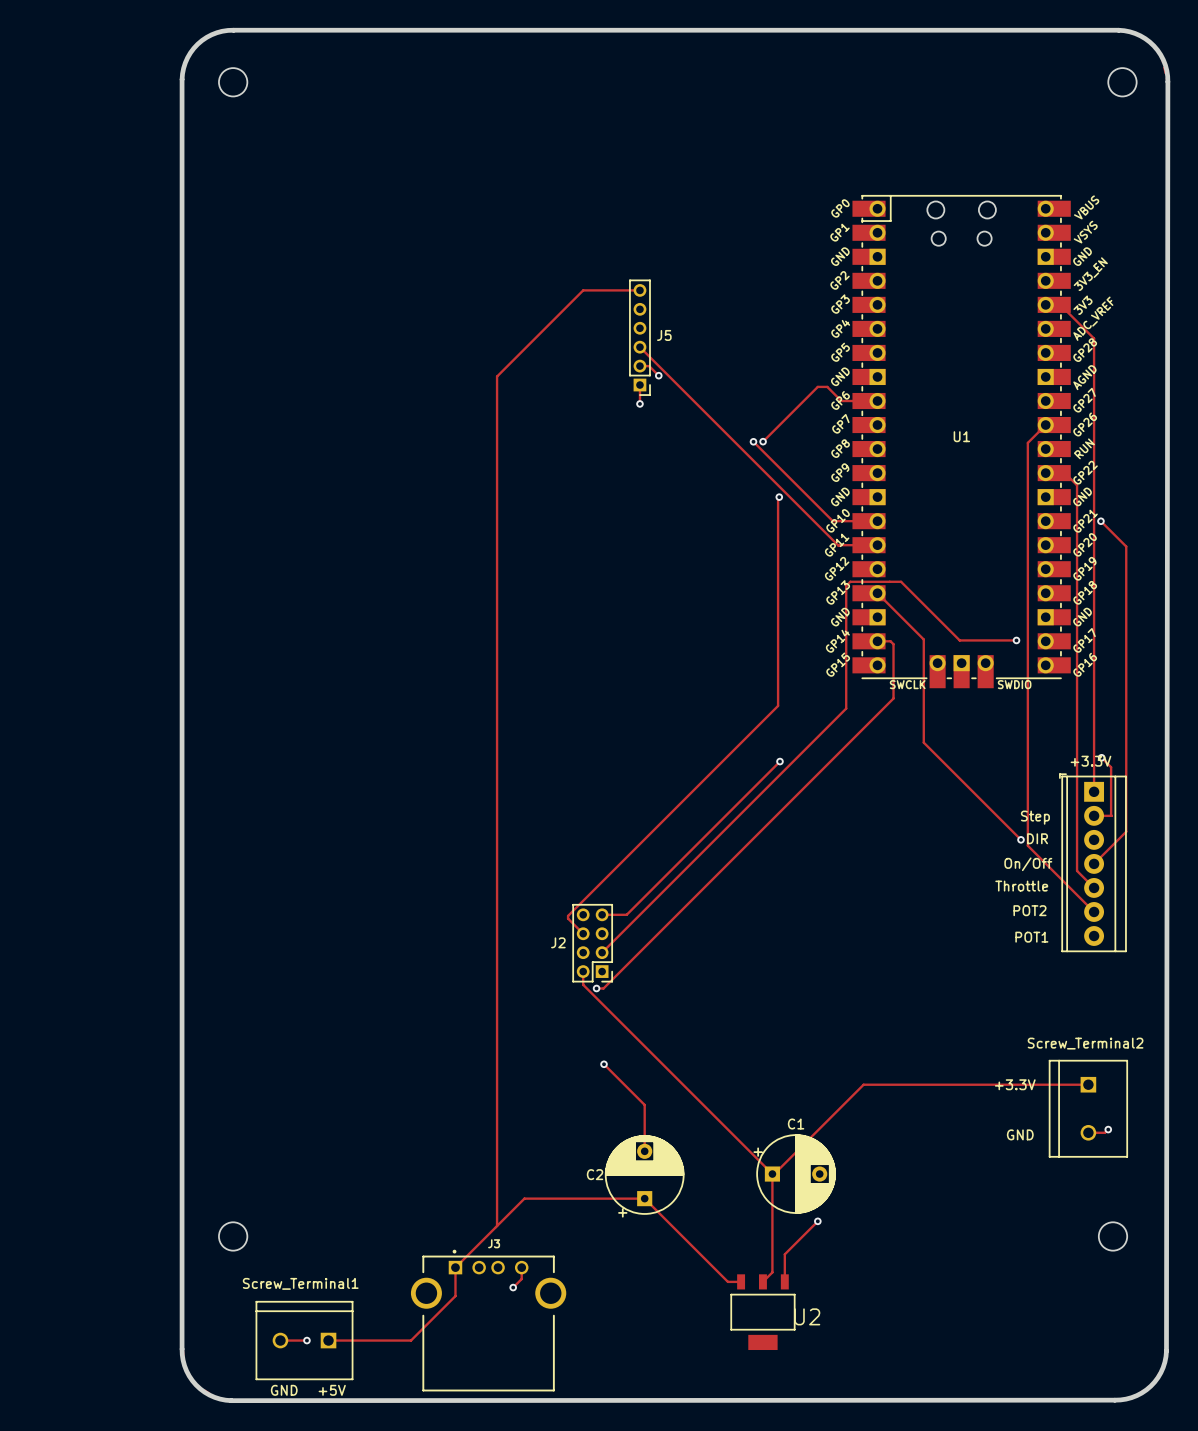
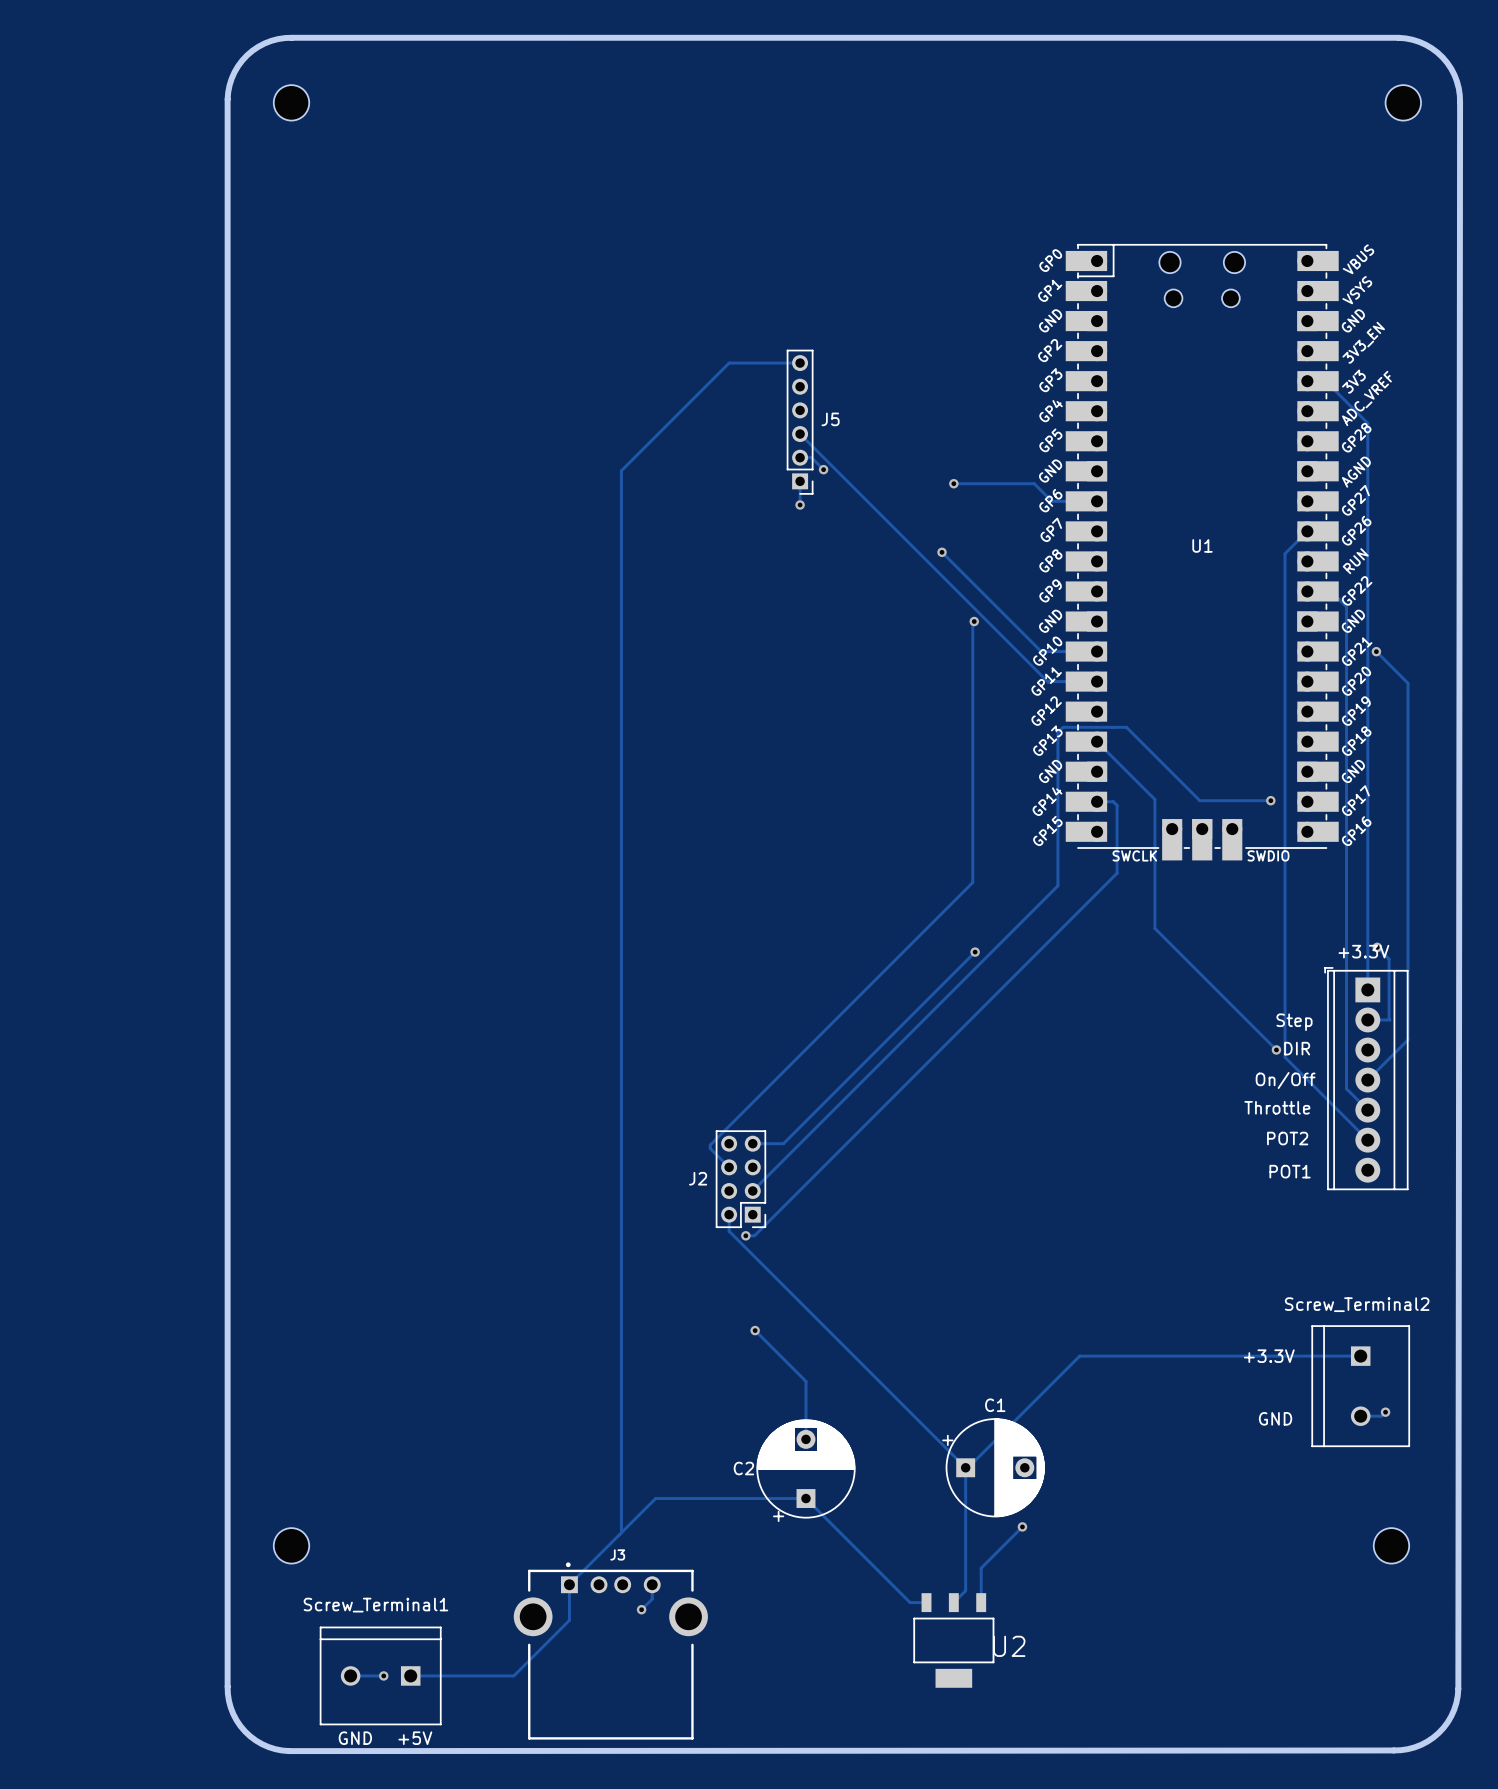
track: (817, 386) (763, 441) -> (1022, 483) (953, 483)
via position: (763, 441) -> (953, 483)

